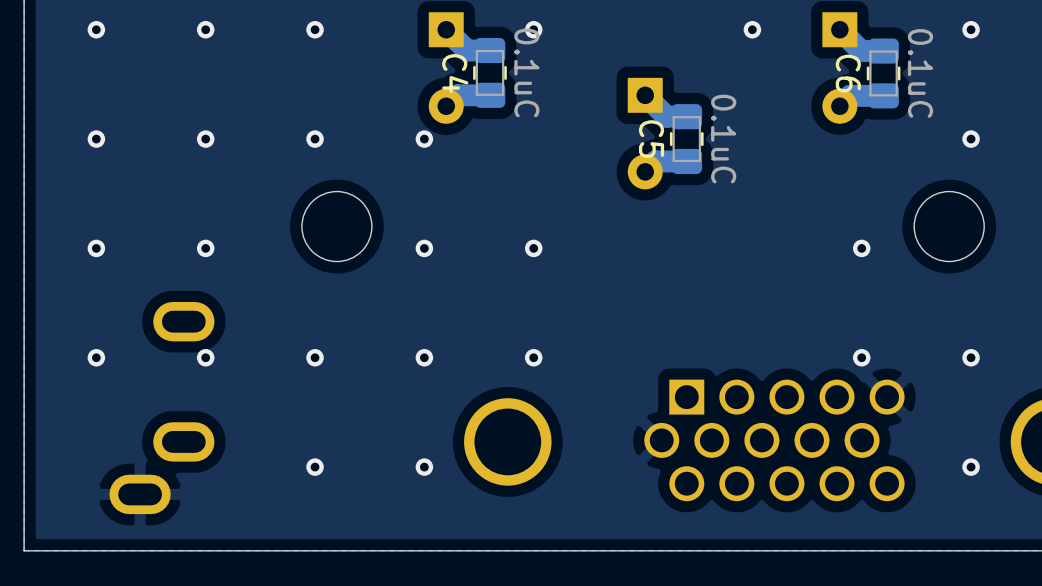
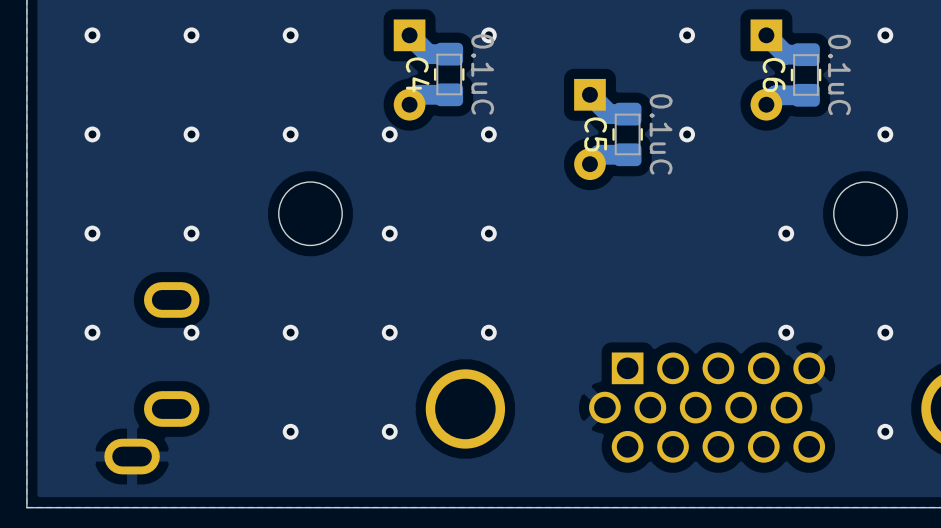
via: none -> (488, 134)
via: none -> (687, 134)

